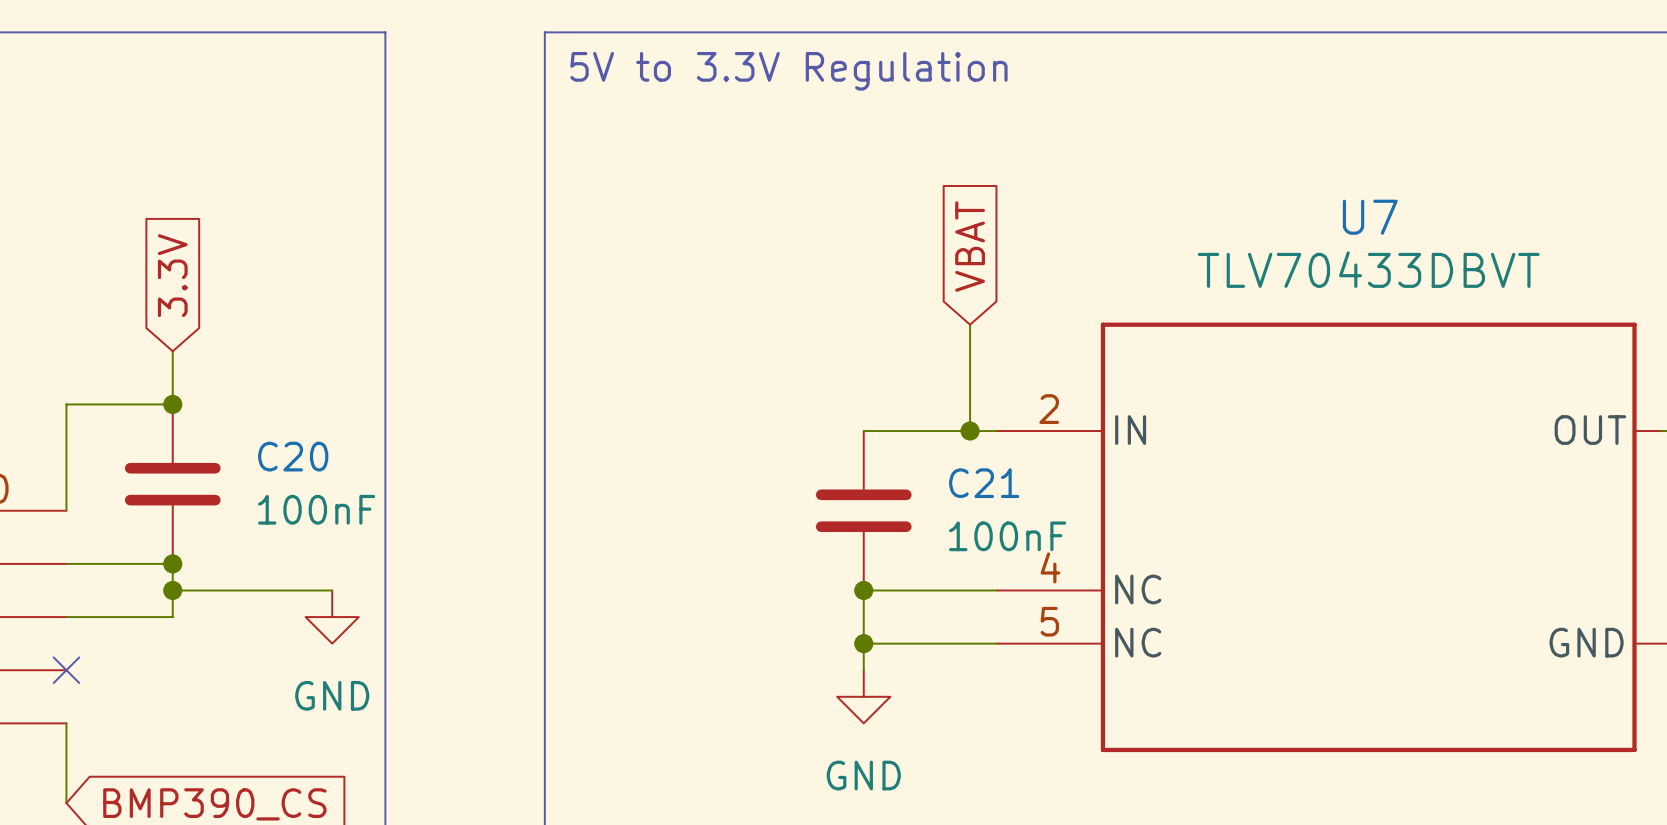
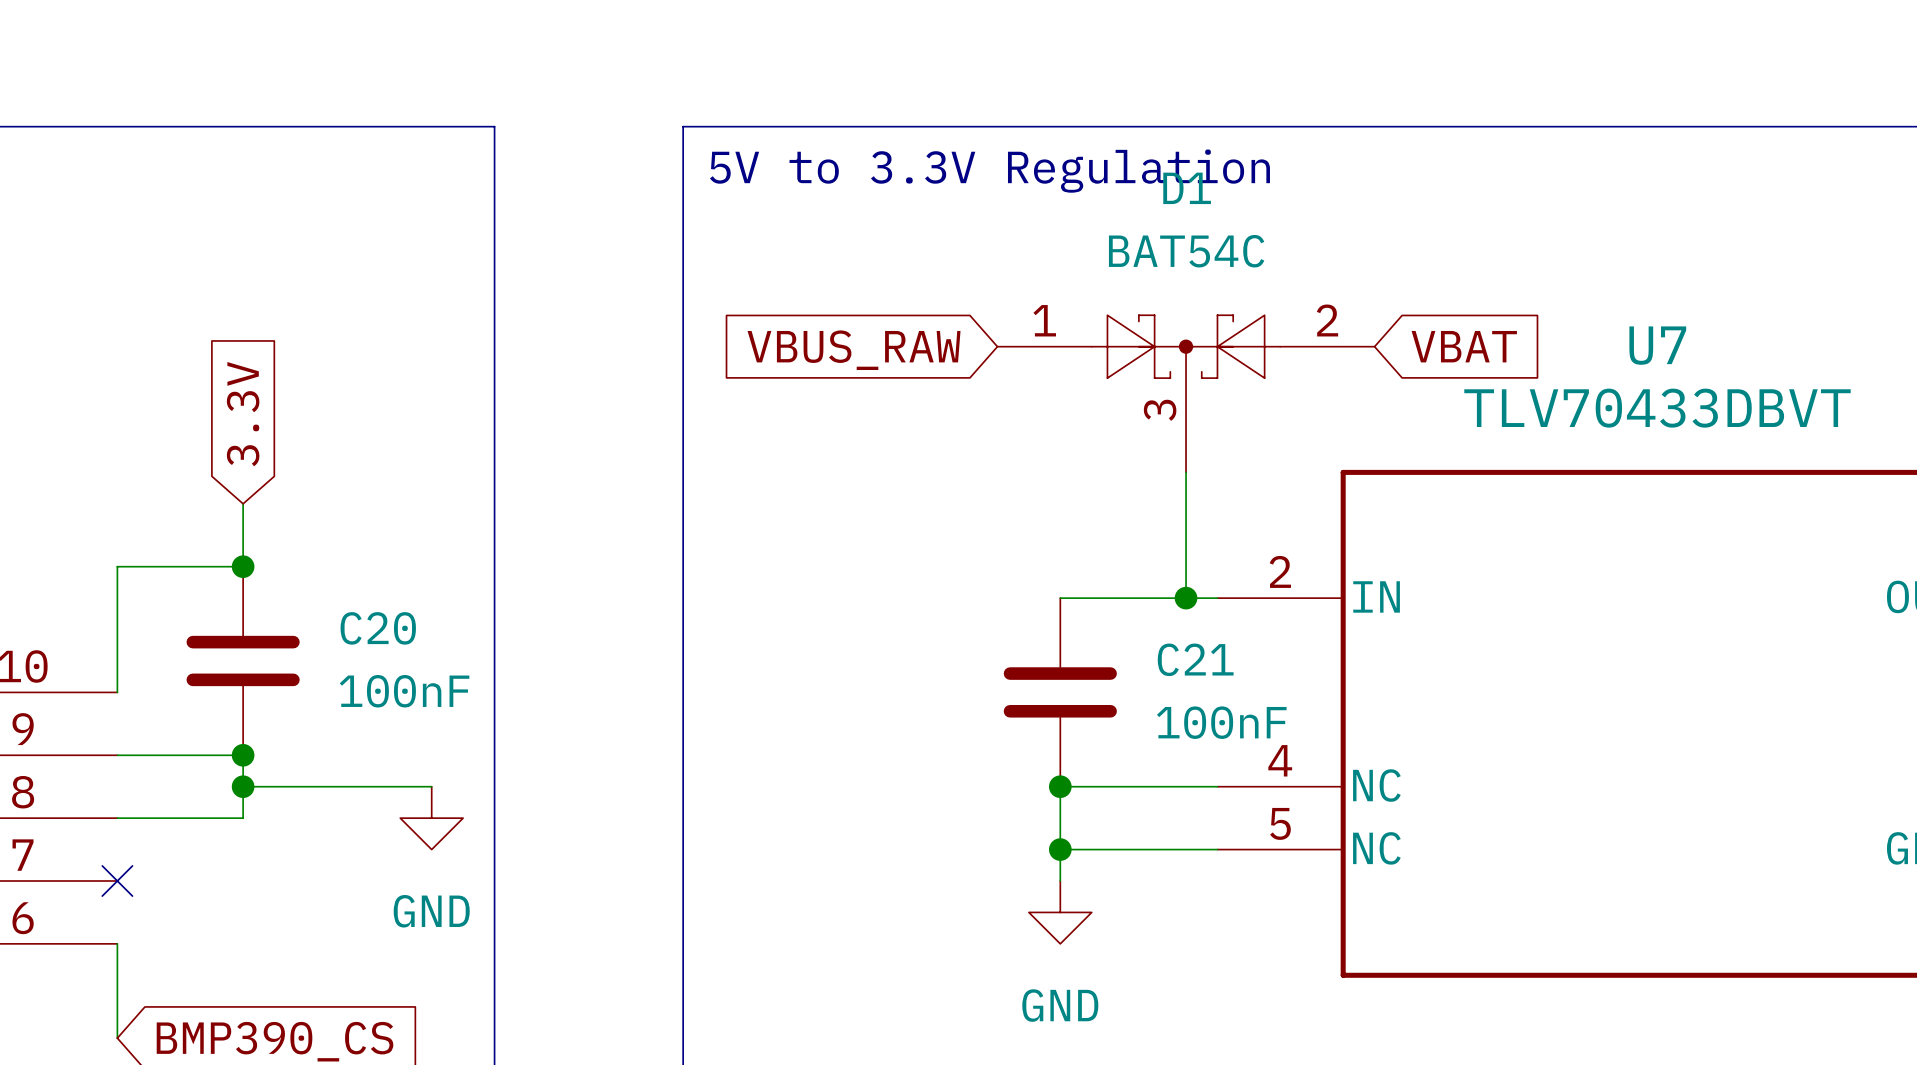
global label: none -> VBUS_RAW (854, 350)
global label rotation: 0° (970, 246) -> 90° clockwise (1464, 346)
global label position: VBAT (970, 246) -> VBAT (1464, 346)
D1: none -> BAT54C (1186, 393)

